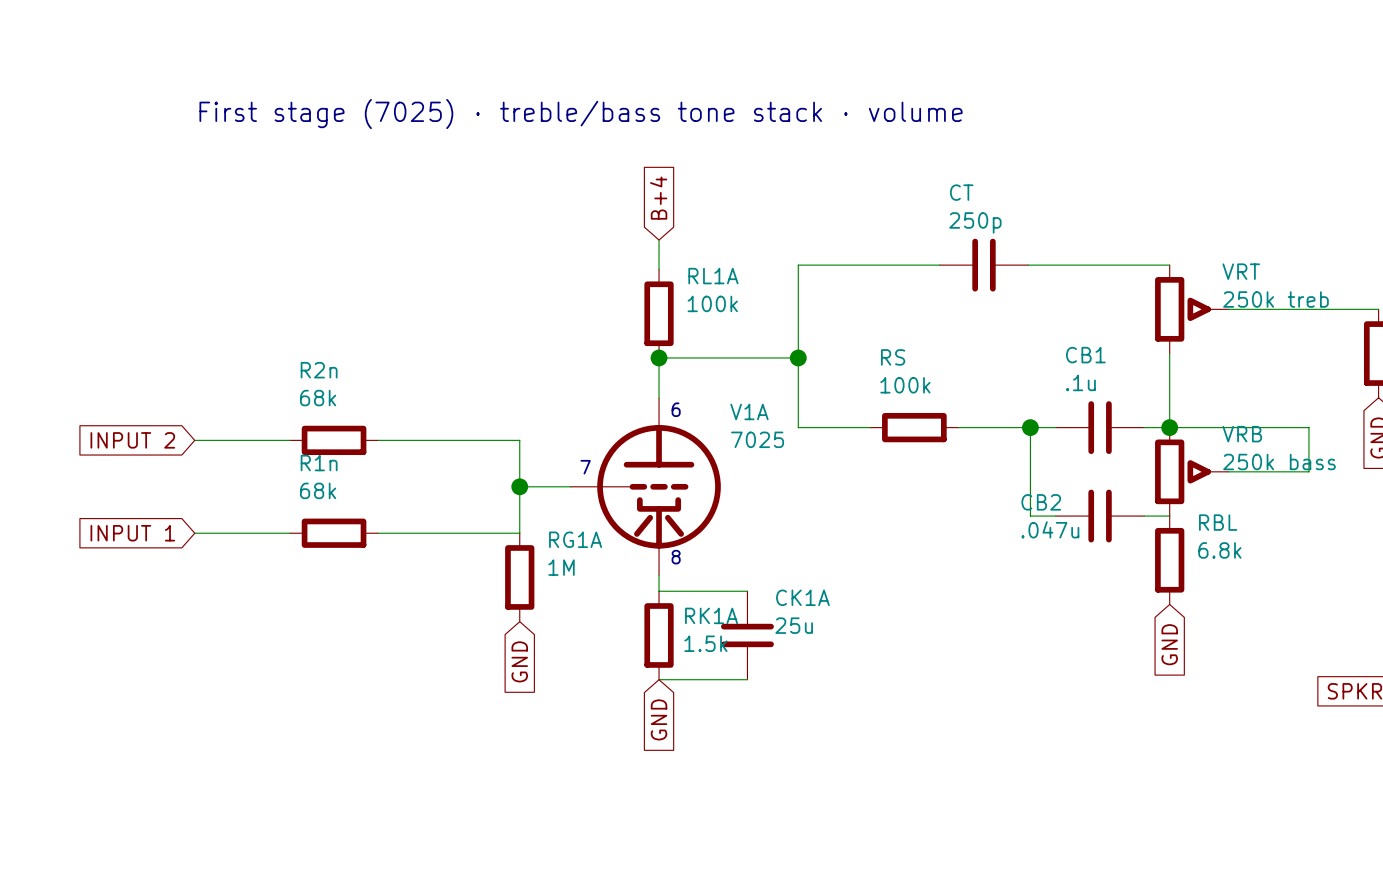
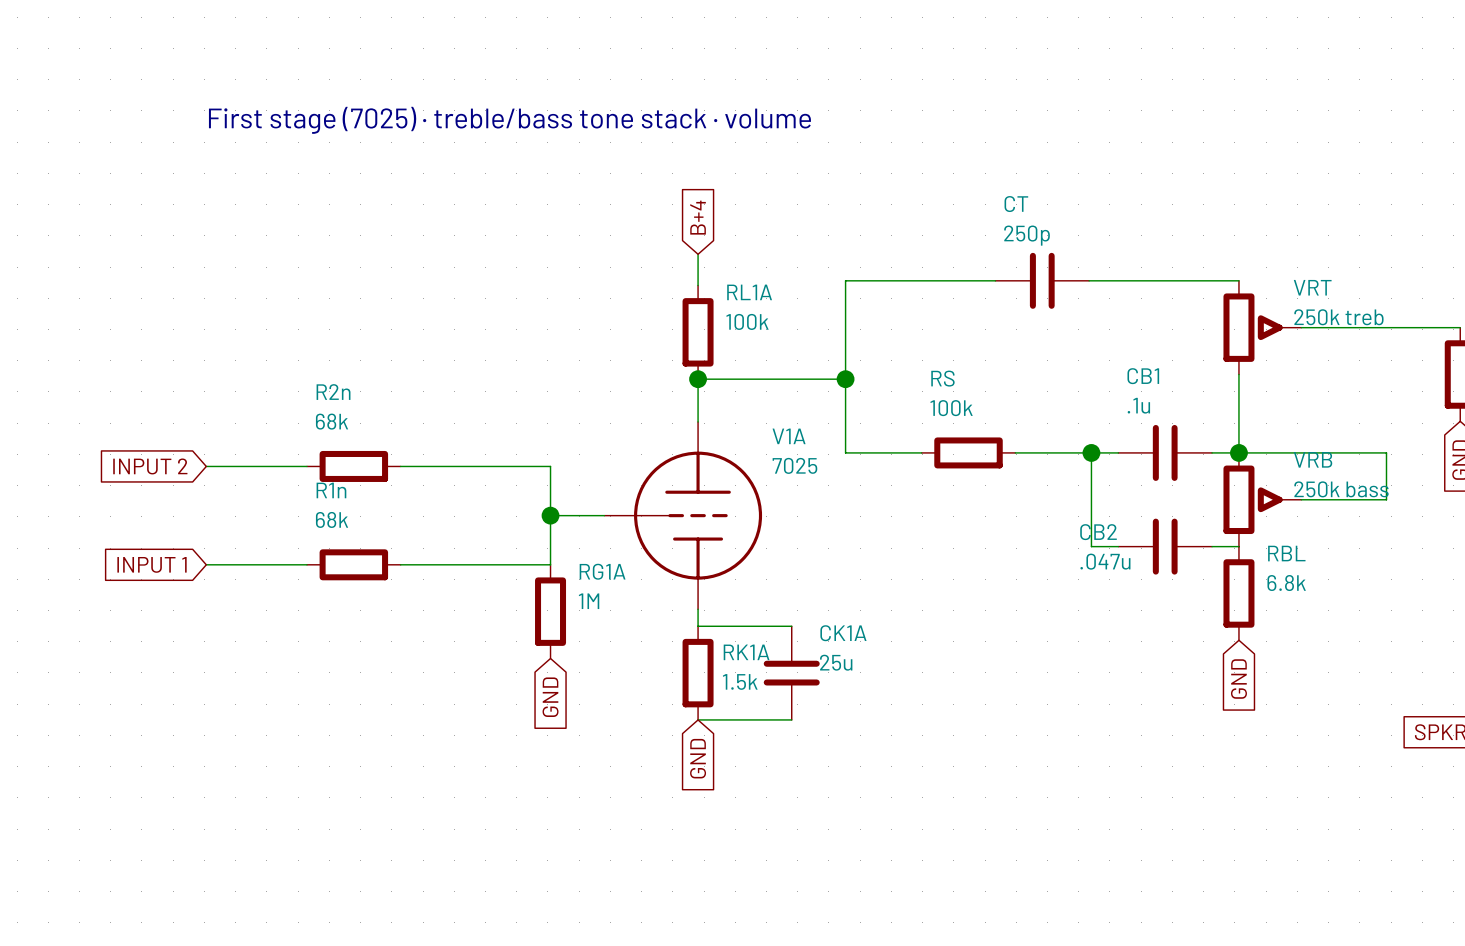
V1A symbol: [570, 398, 721, 576] -> [604, 421, 763, 610]
text: 6 (676, 409) -> none
text: 7 (585, 467) -> none
text: 8 (676, 557) -> none

